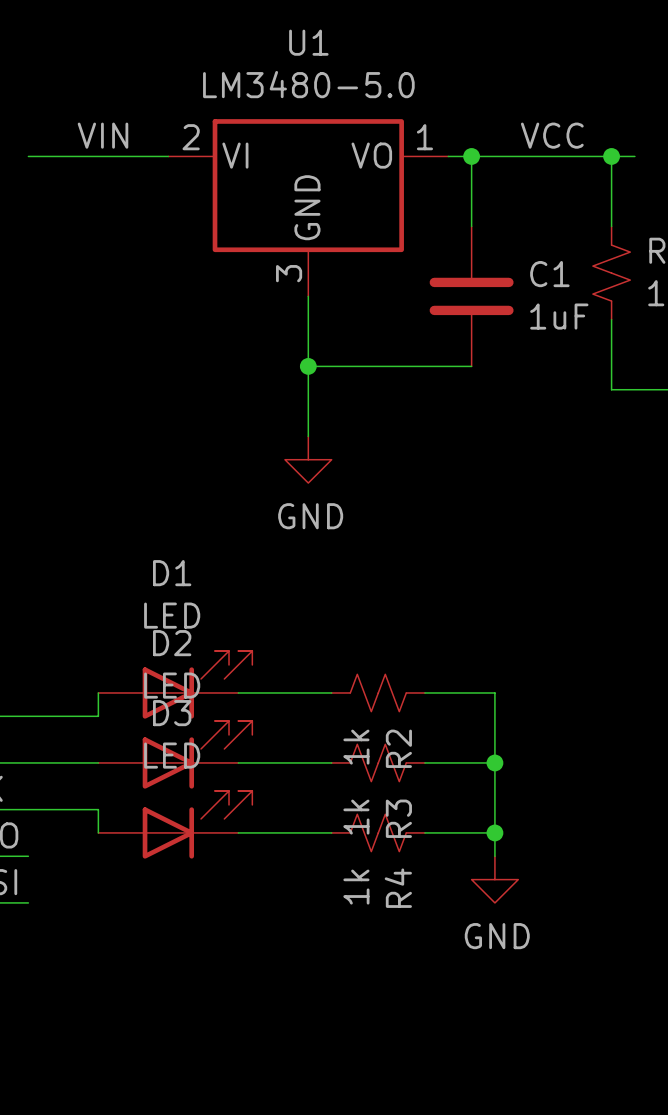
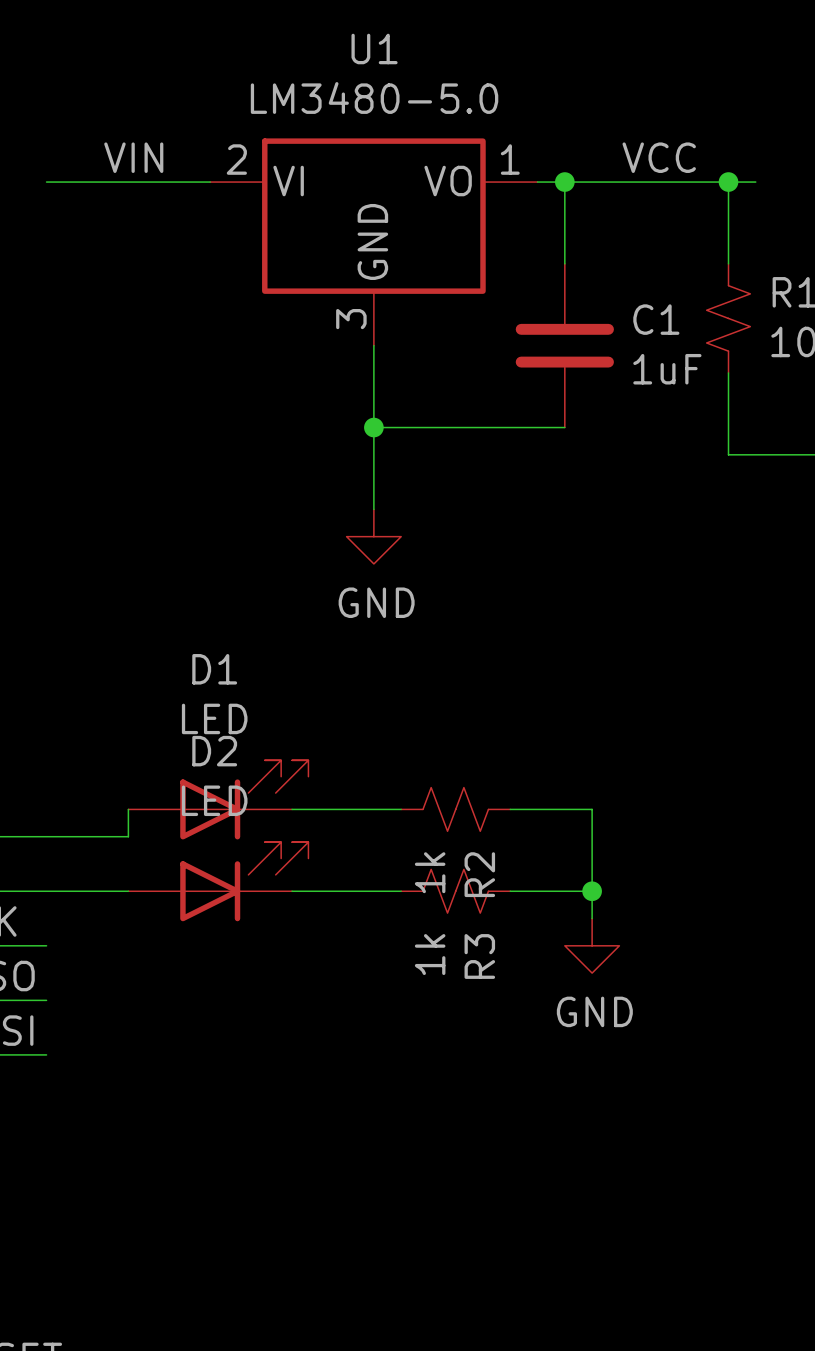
wire: (494, 786) (494, 856) -> none
wire: (28, 809) (98, 809) (98, 832) -> none
D3: LED (175, 824) -> none
wire: (238, 832) (331, 832) -> none
R4: 1k (378, 832) -> none
wire: (424, 832) (494, 832) -> none
junction: (494, 832) -> none
power symbol position: GND (494, 879) -> GND (592, 945)

